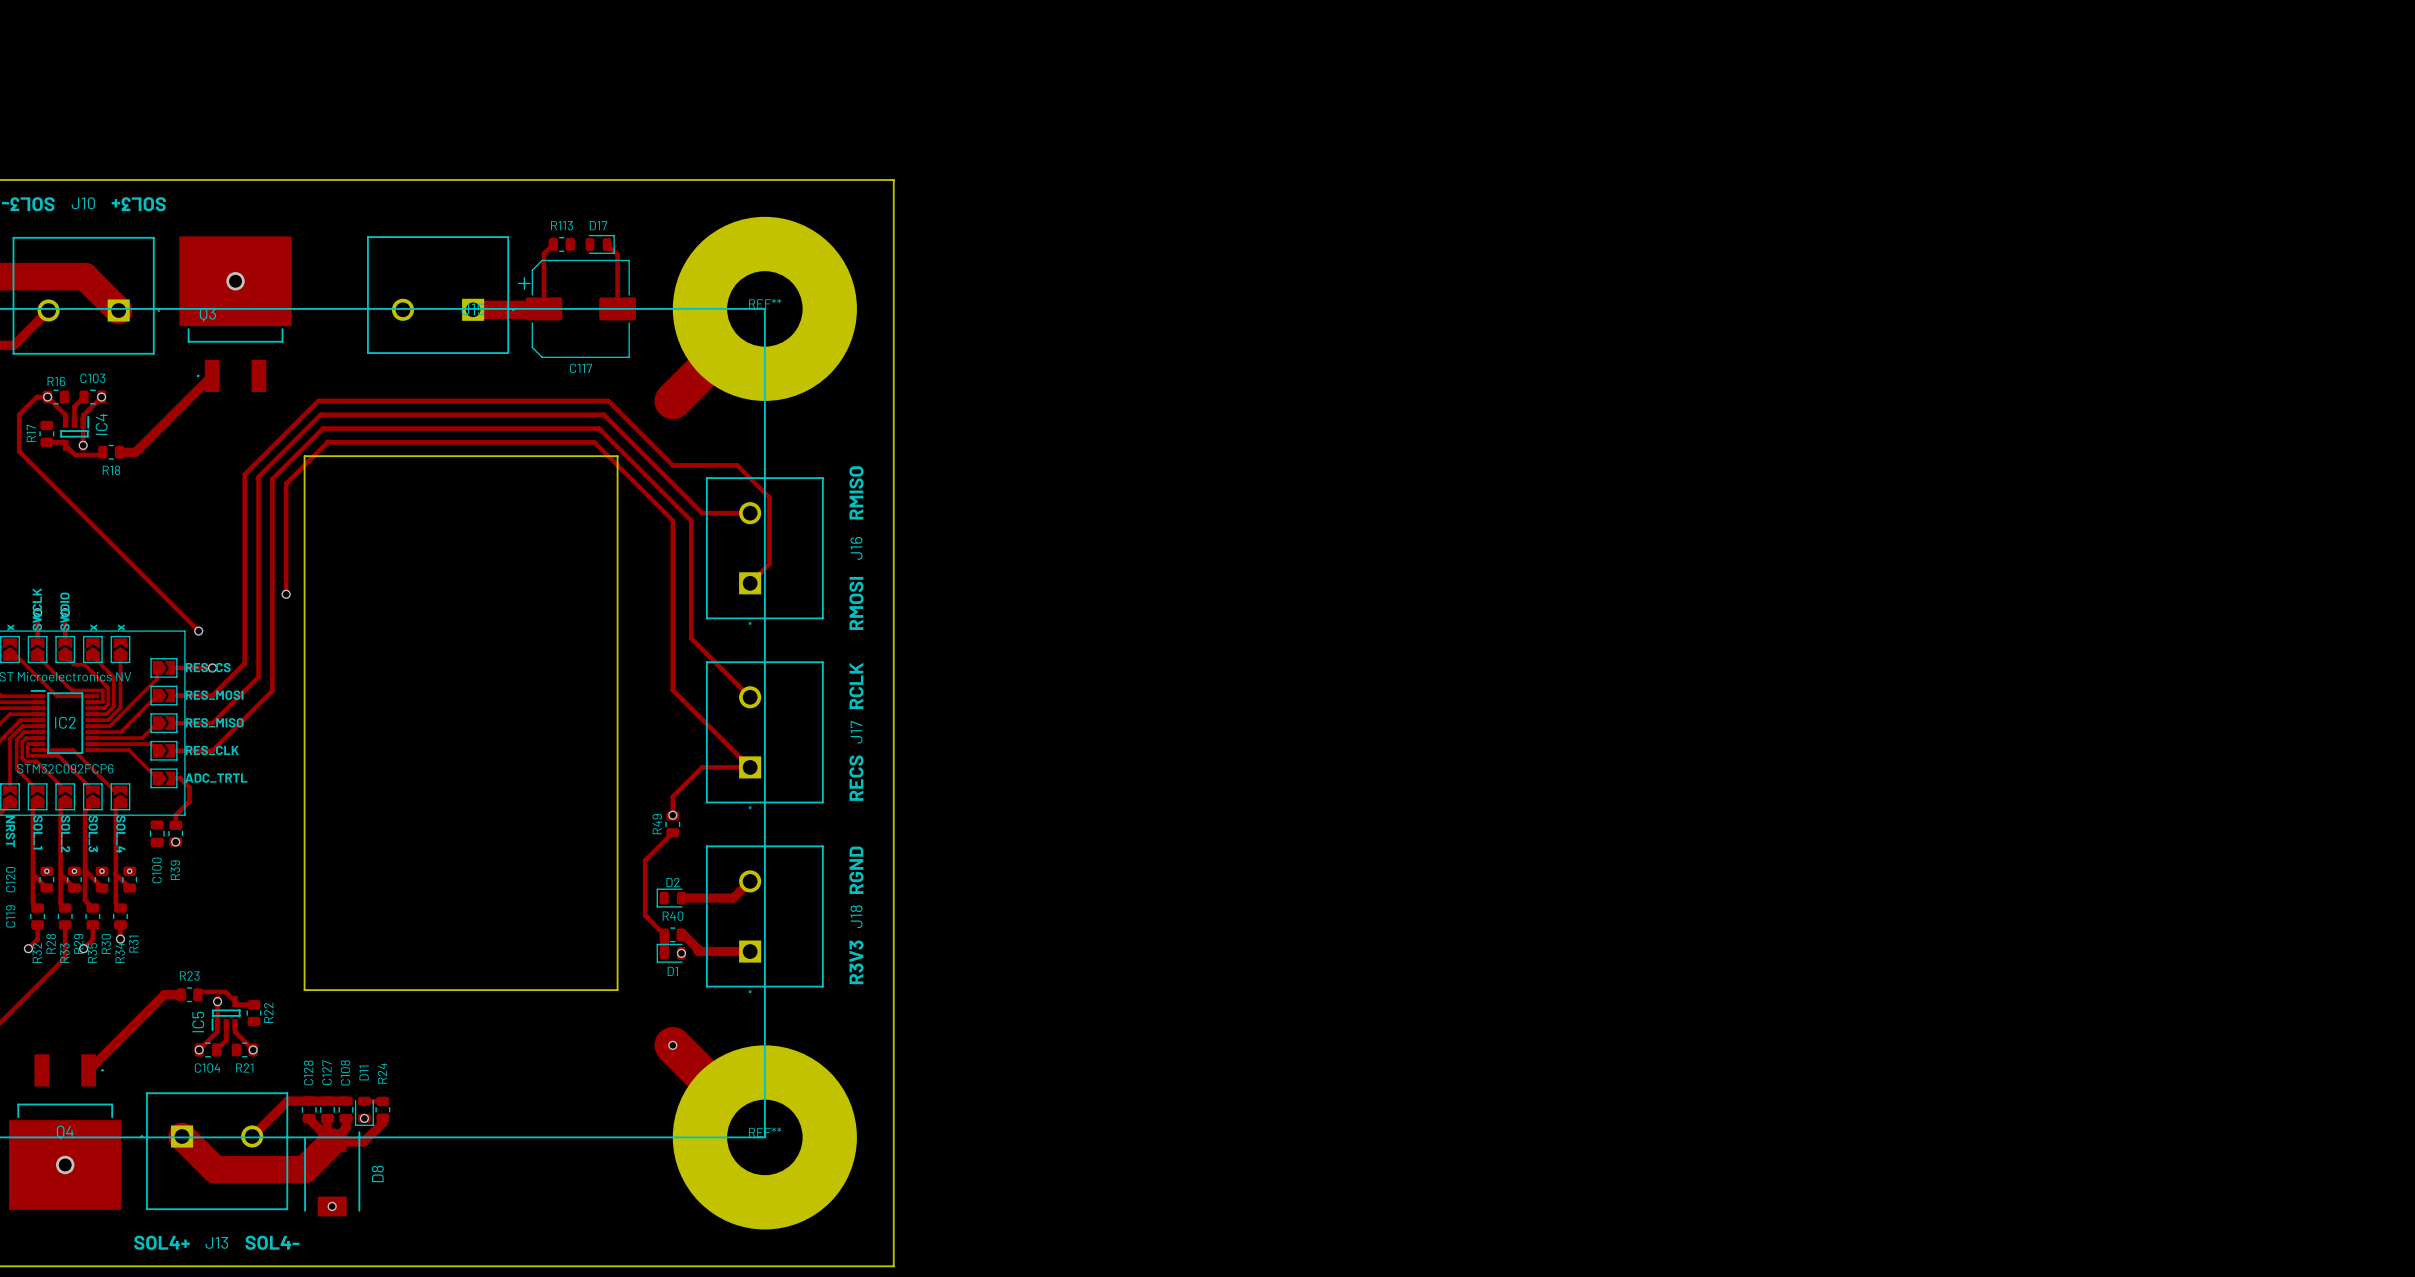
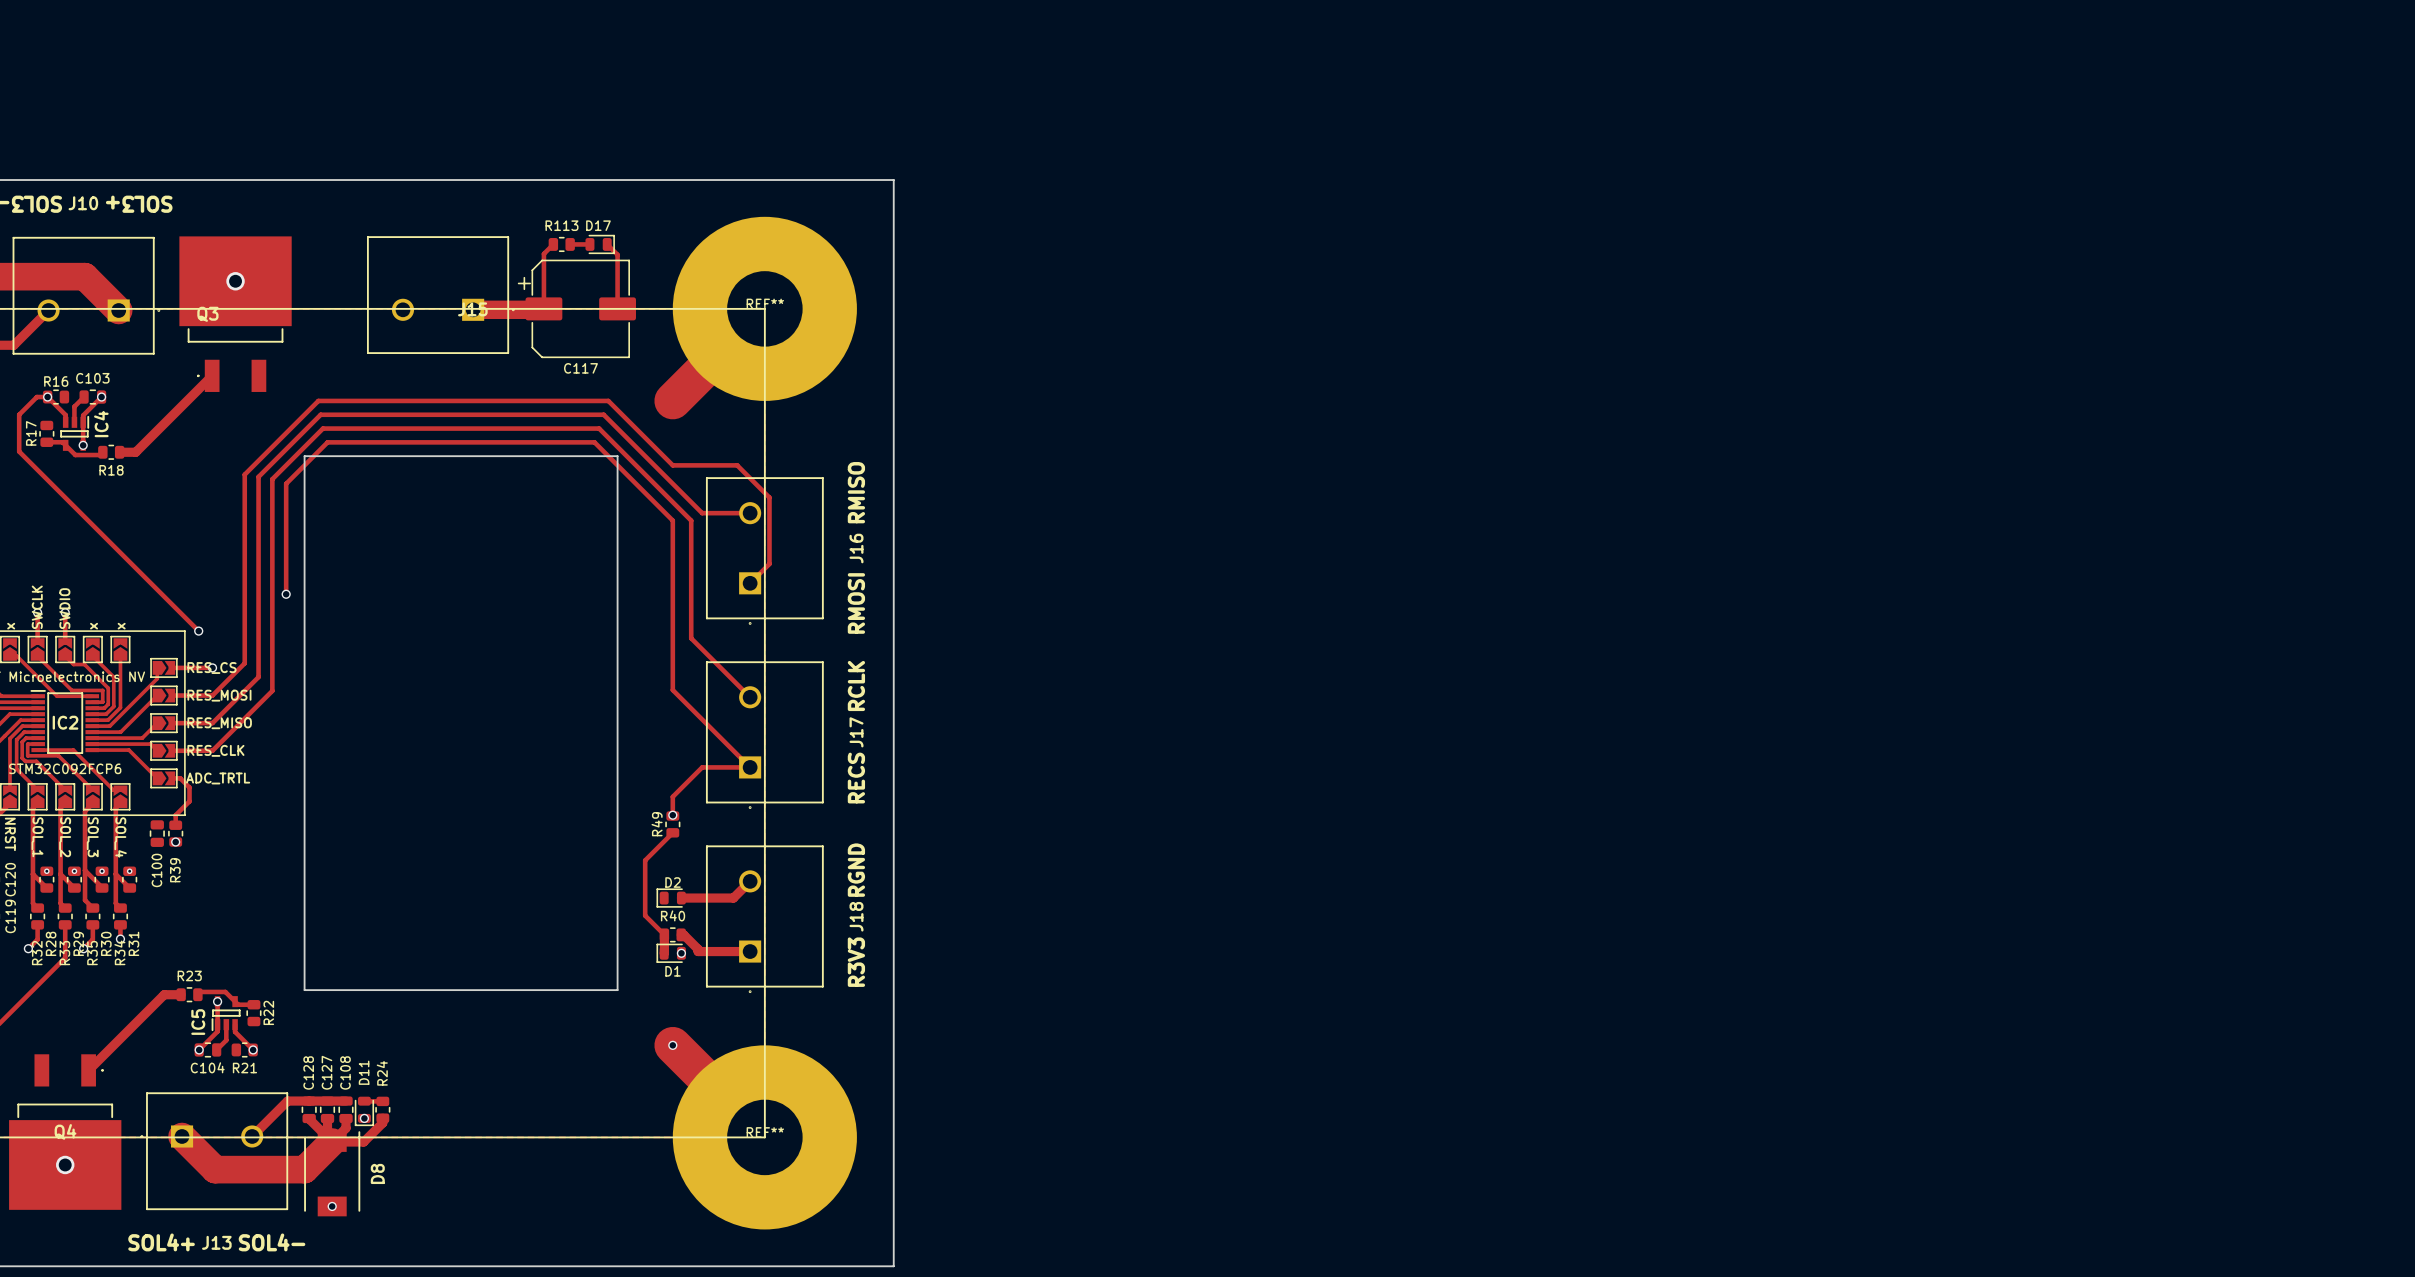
track: none -> (570, 244) (589, 244)

